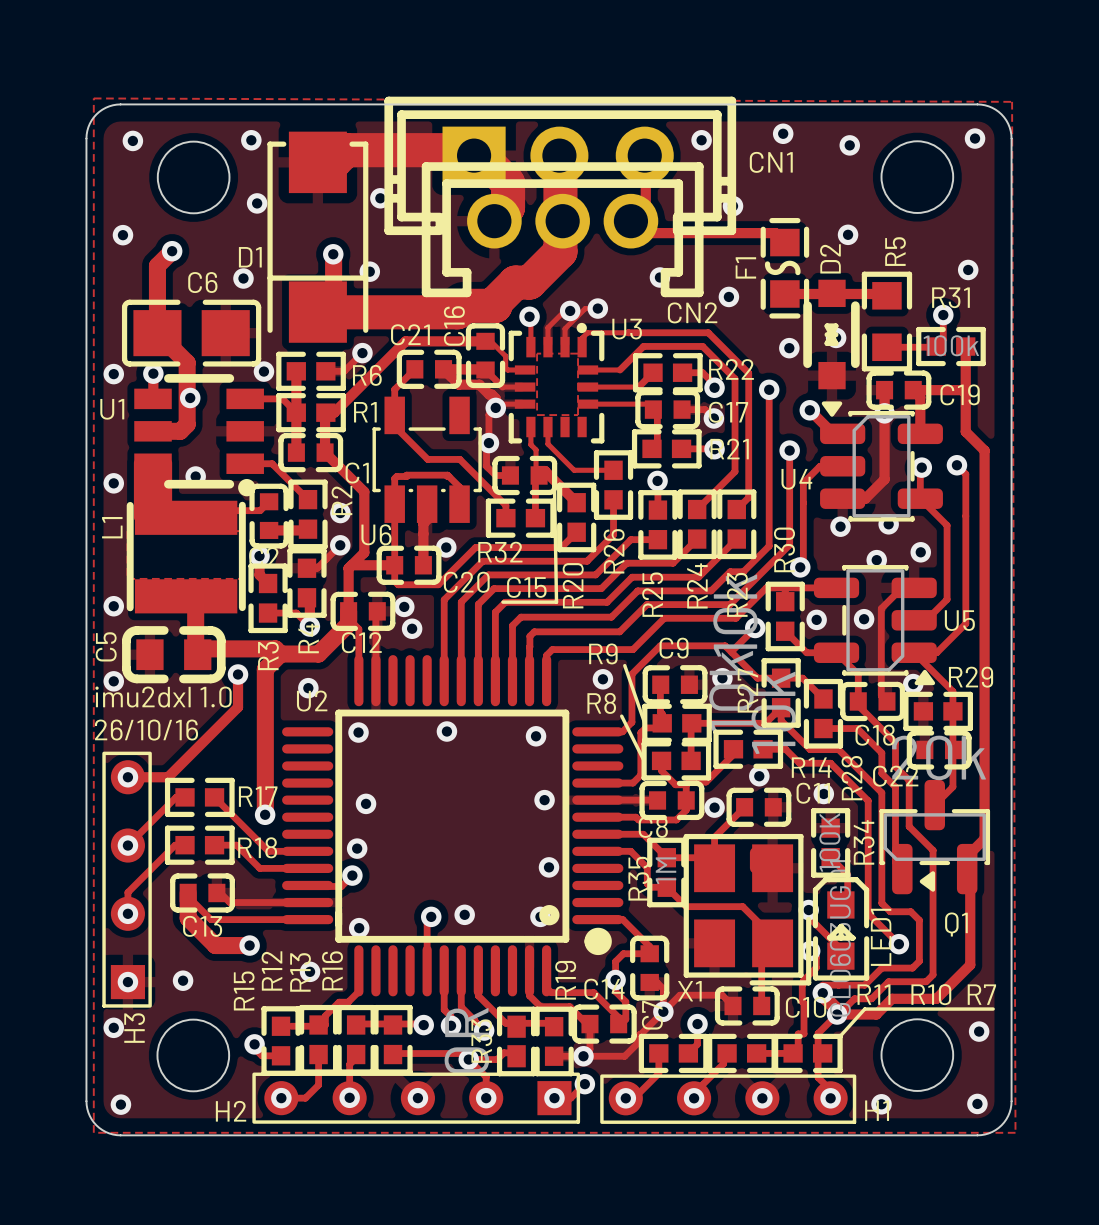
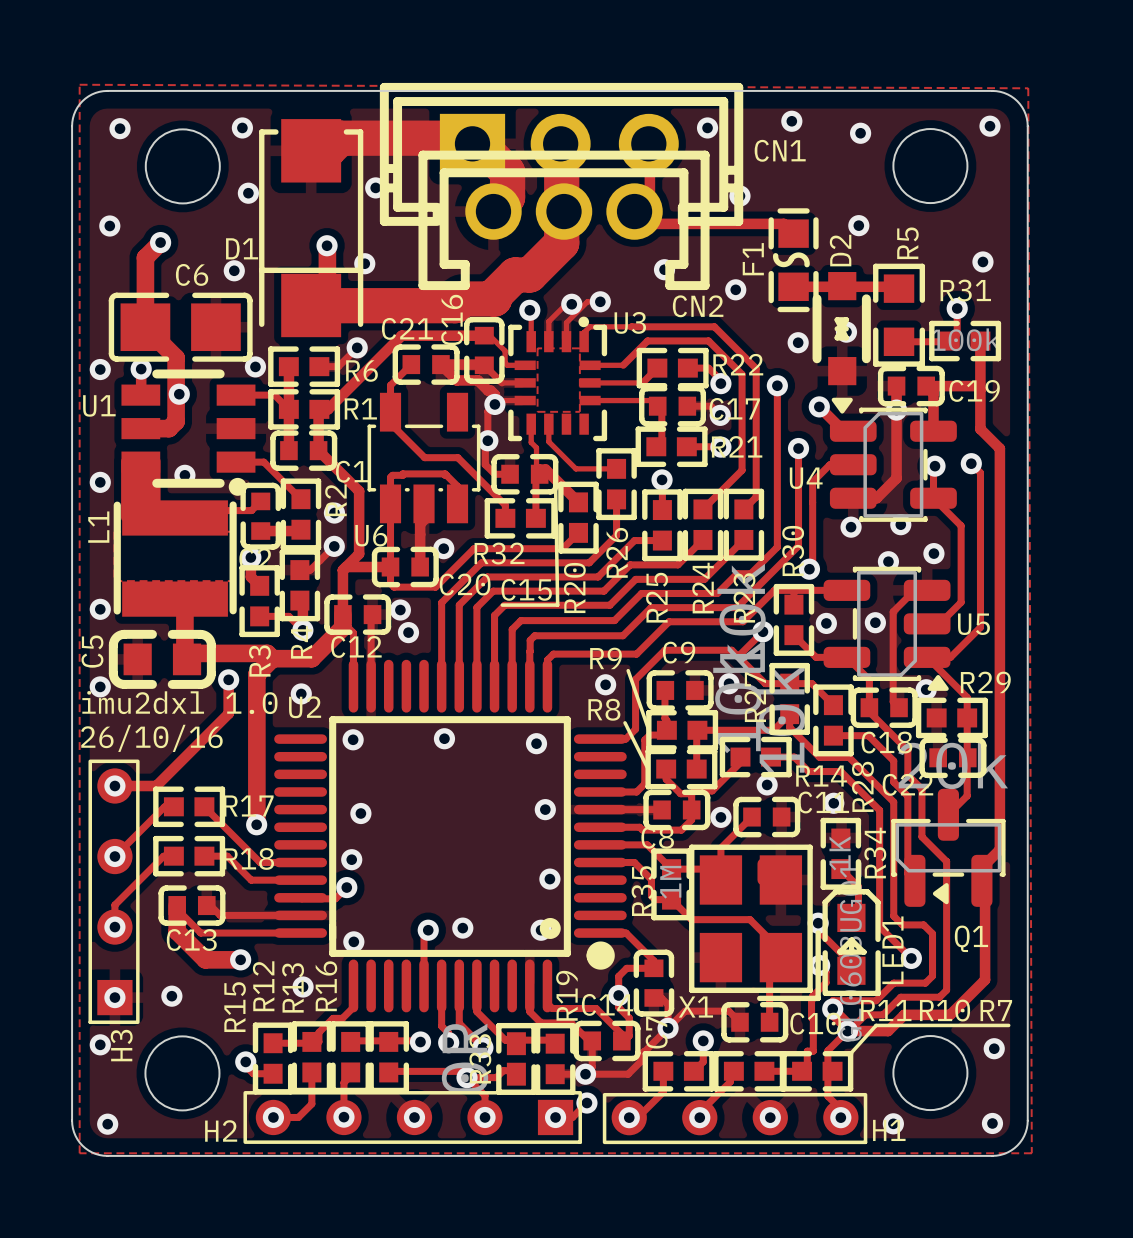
R34 value: 100K (829, 842) -> 1K (840, 853)

